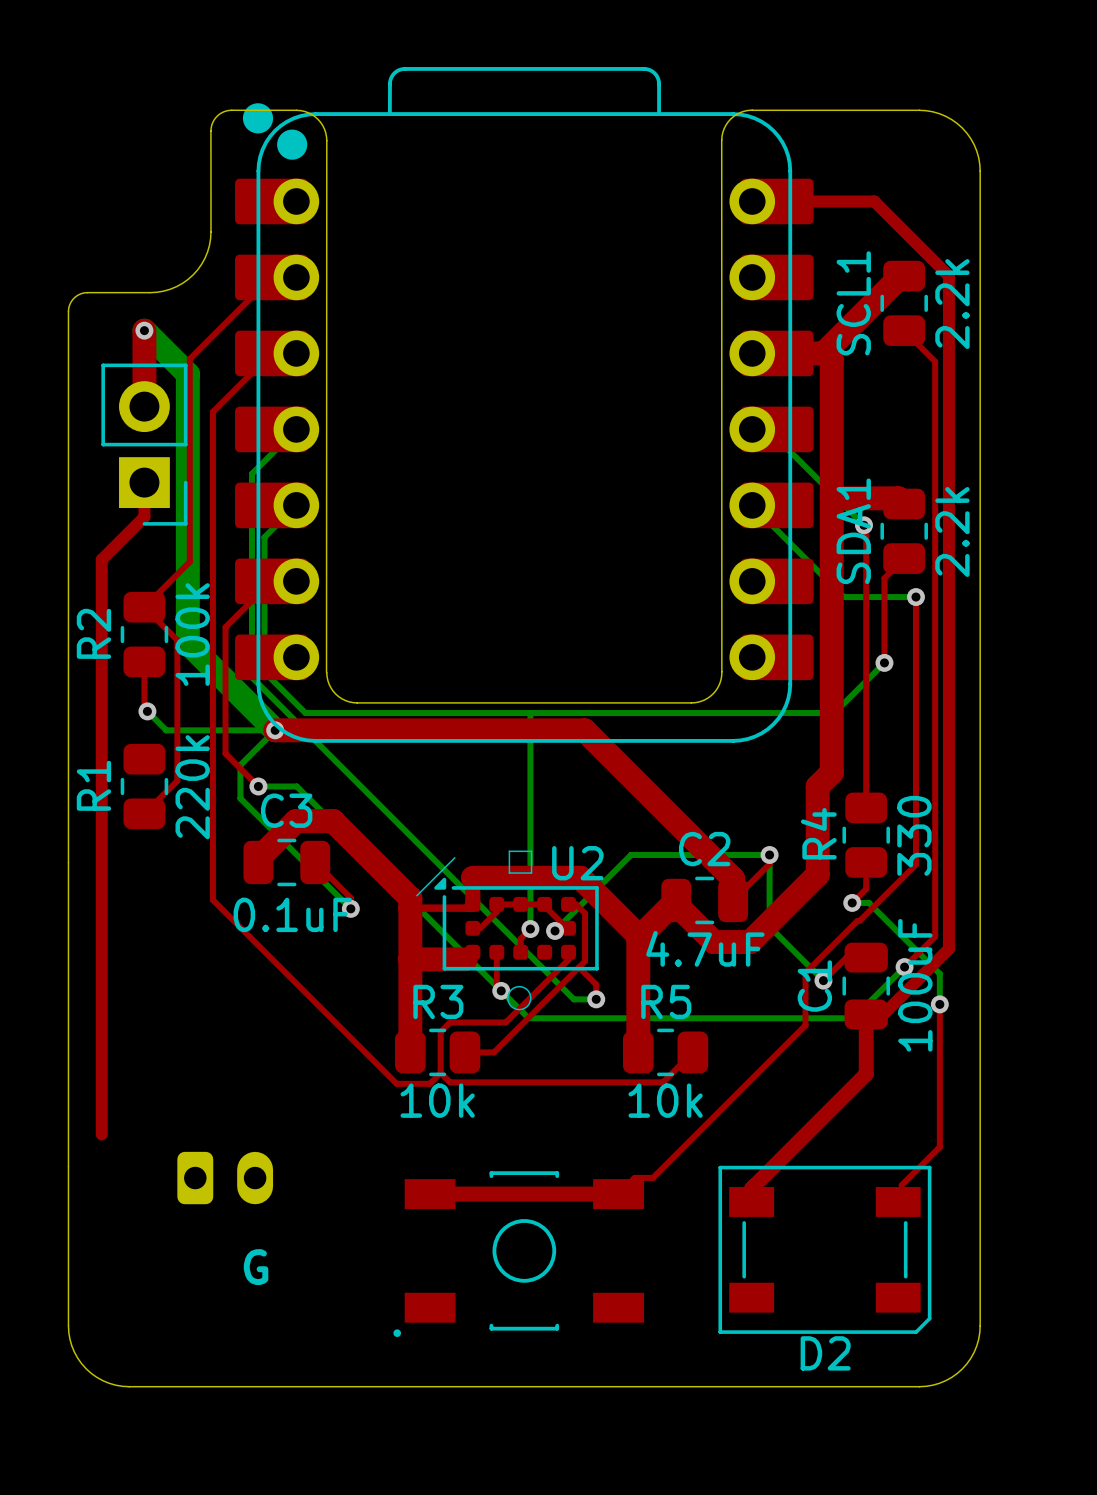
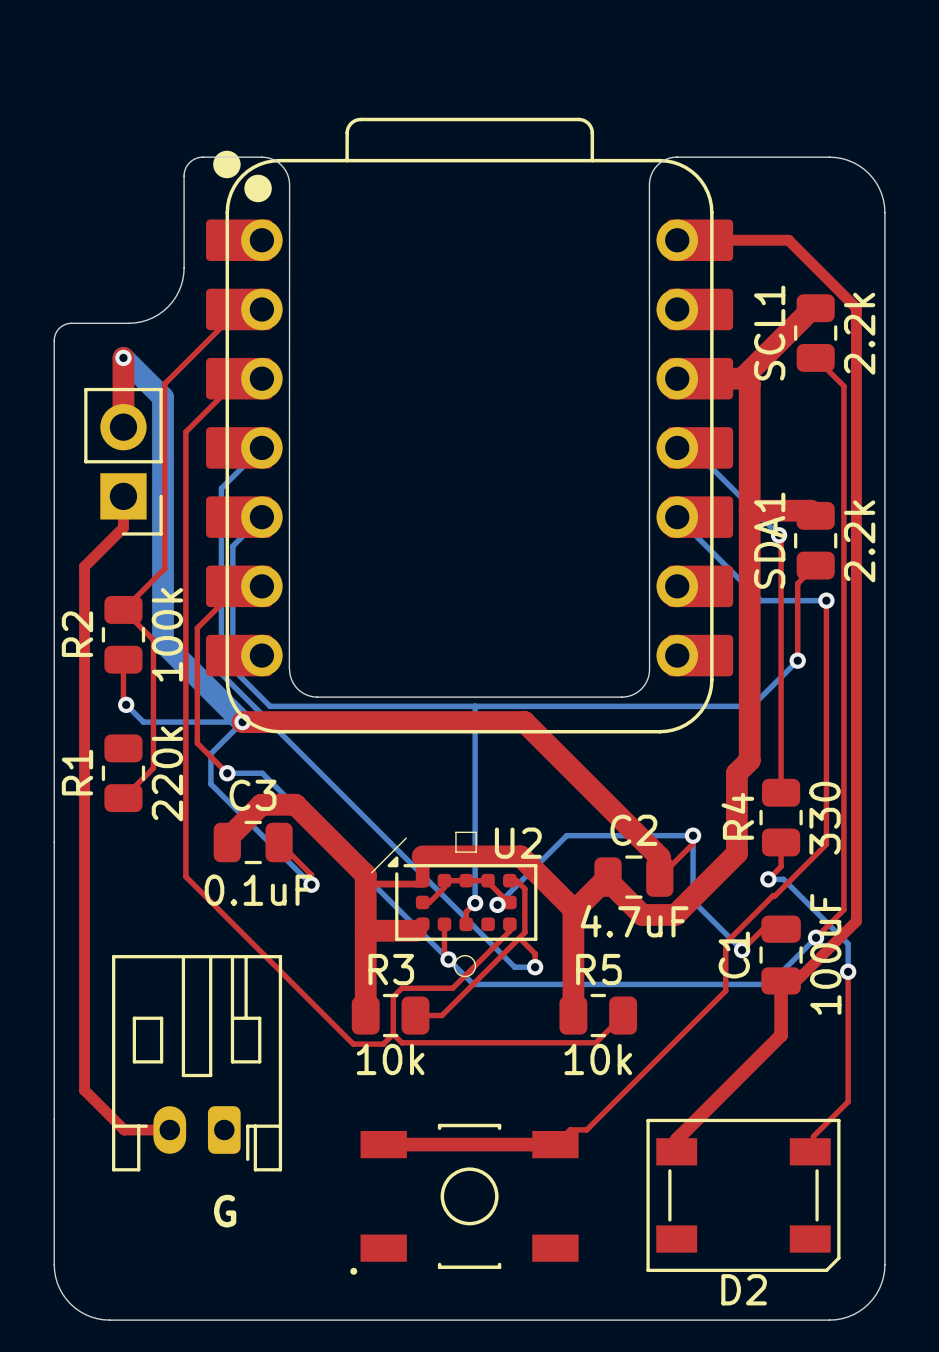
top track: none -> (84, 1090) (124, 1130) (169, 1130)
part side: bottom (225, 1178) -> top (197, 1063)

